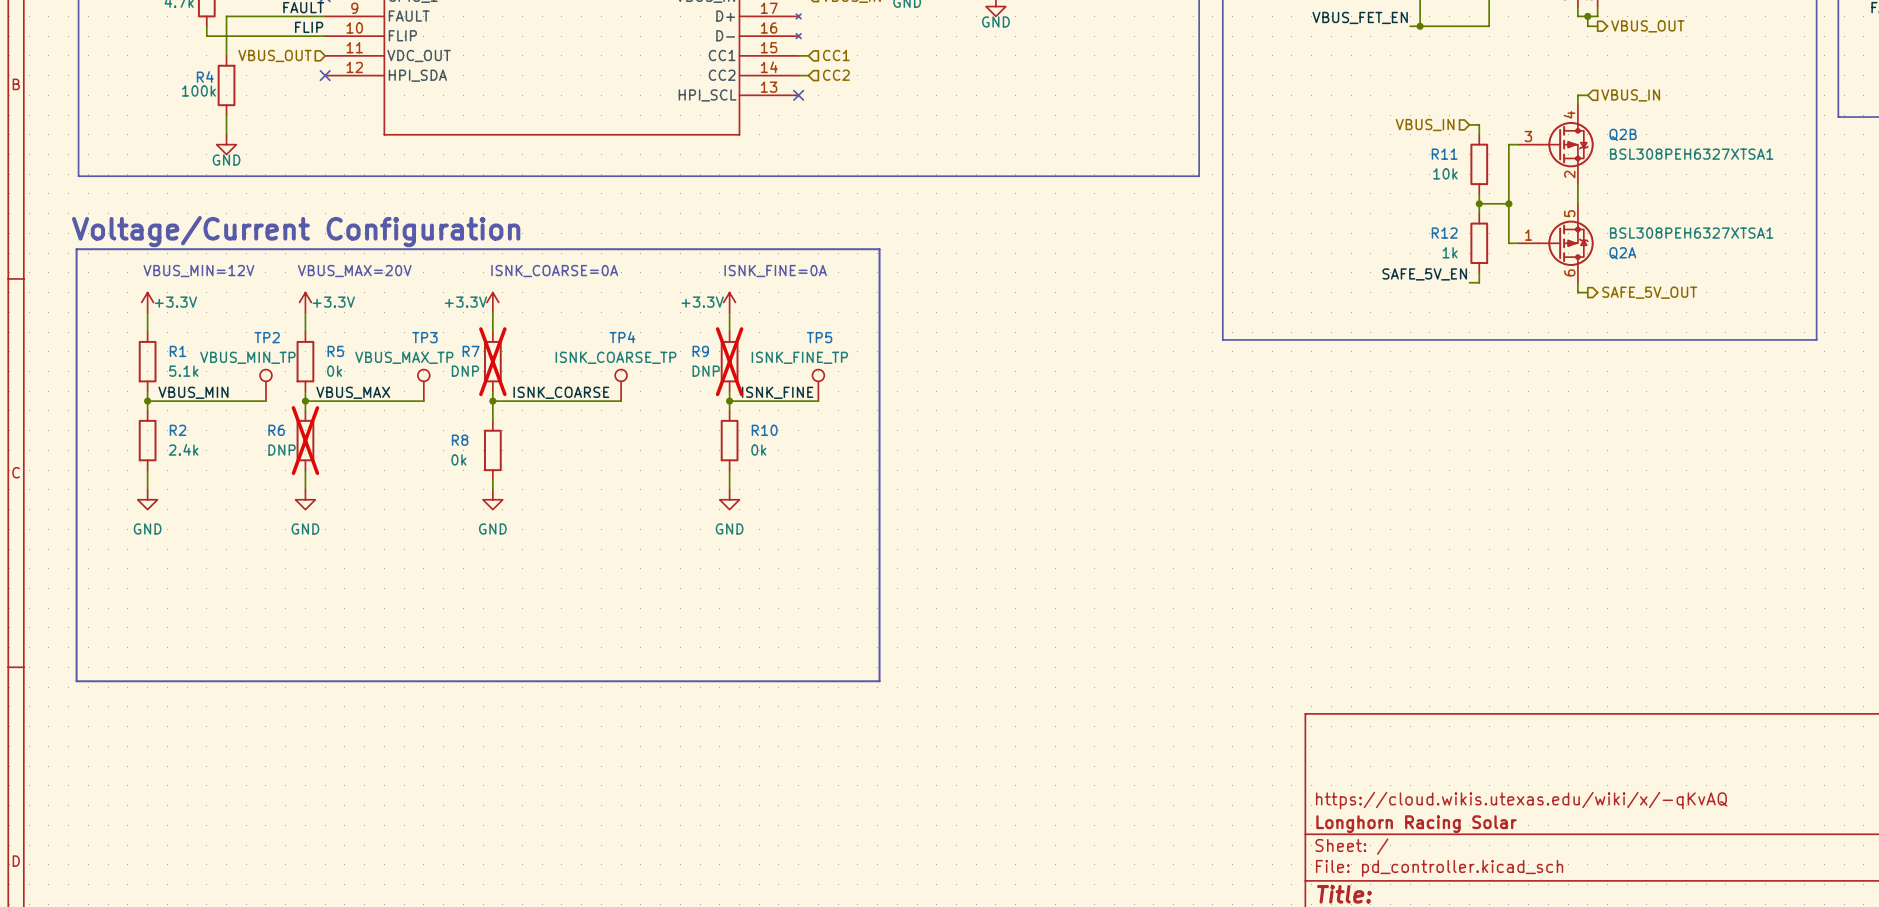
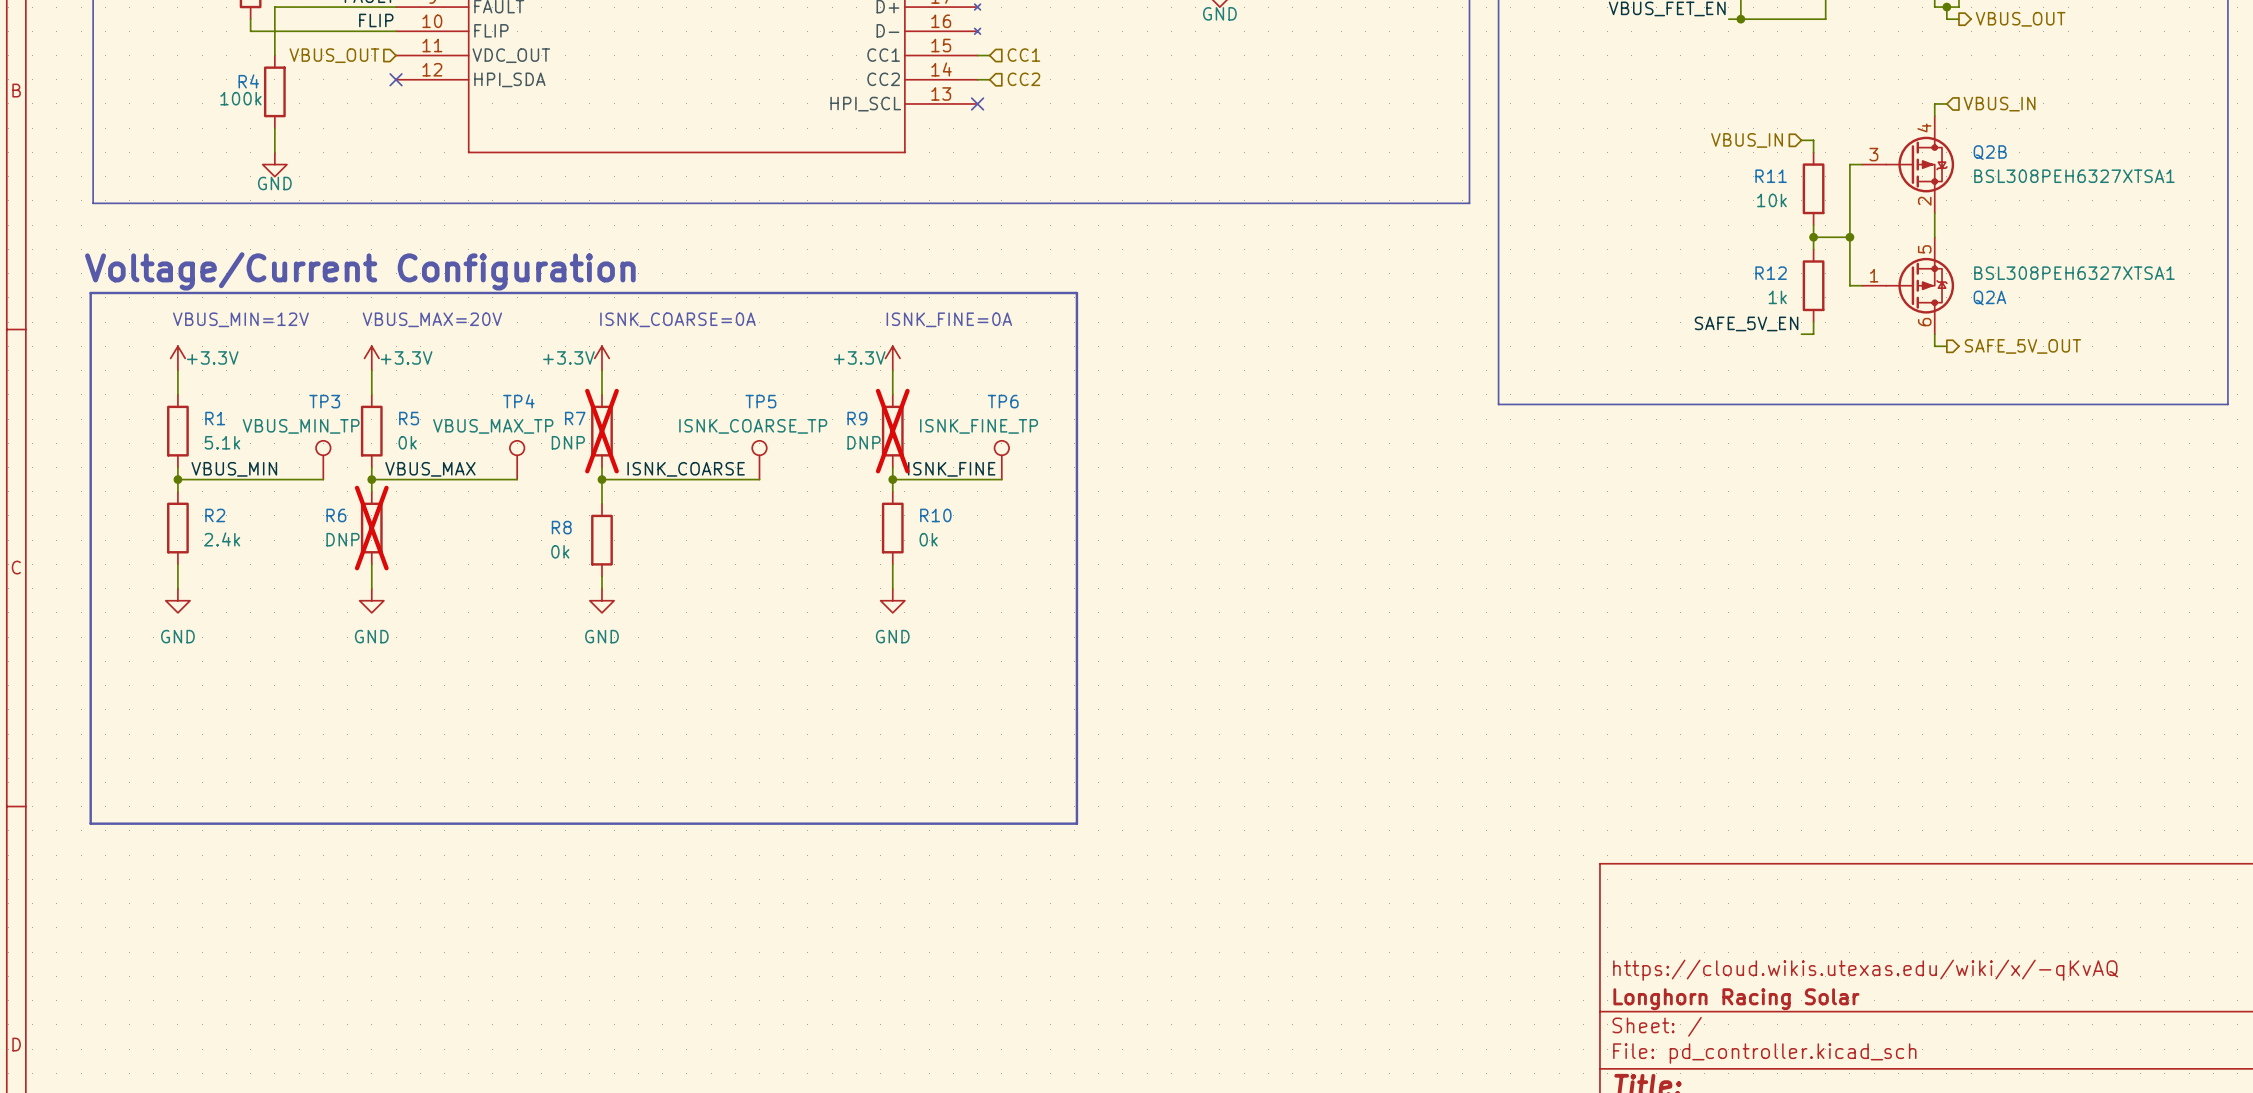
TP2 name: TP2 (267, 337) -> TP3 (324, 401)
TP3 name: TP3 (424, 337) -> TP4 (518, 401)
TP4 name: TP4 (622, 337) -> TP5 (760, 401)
TP5 name: TP5 (819, 337) -> TP6 (1003, 401)

